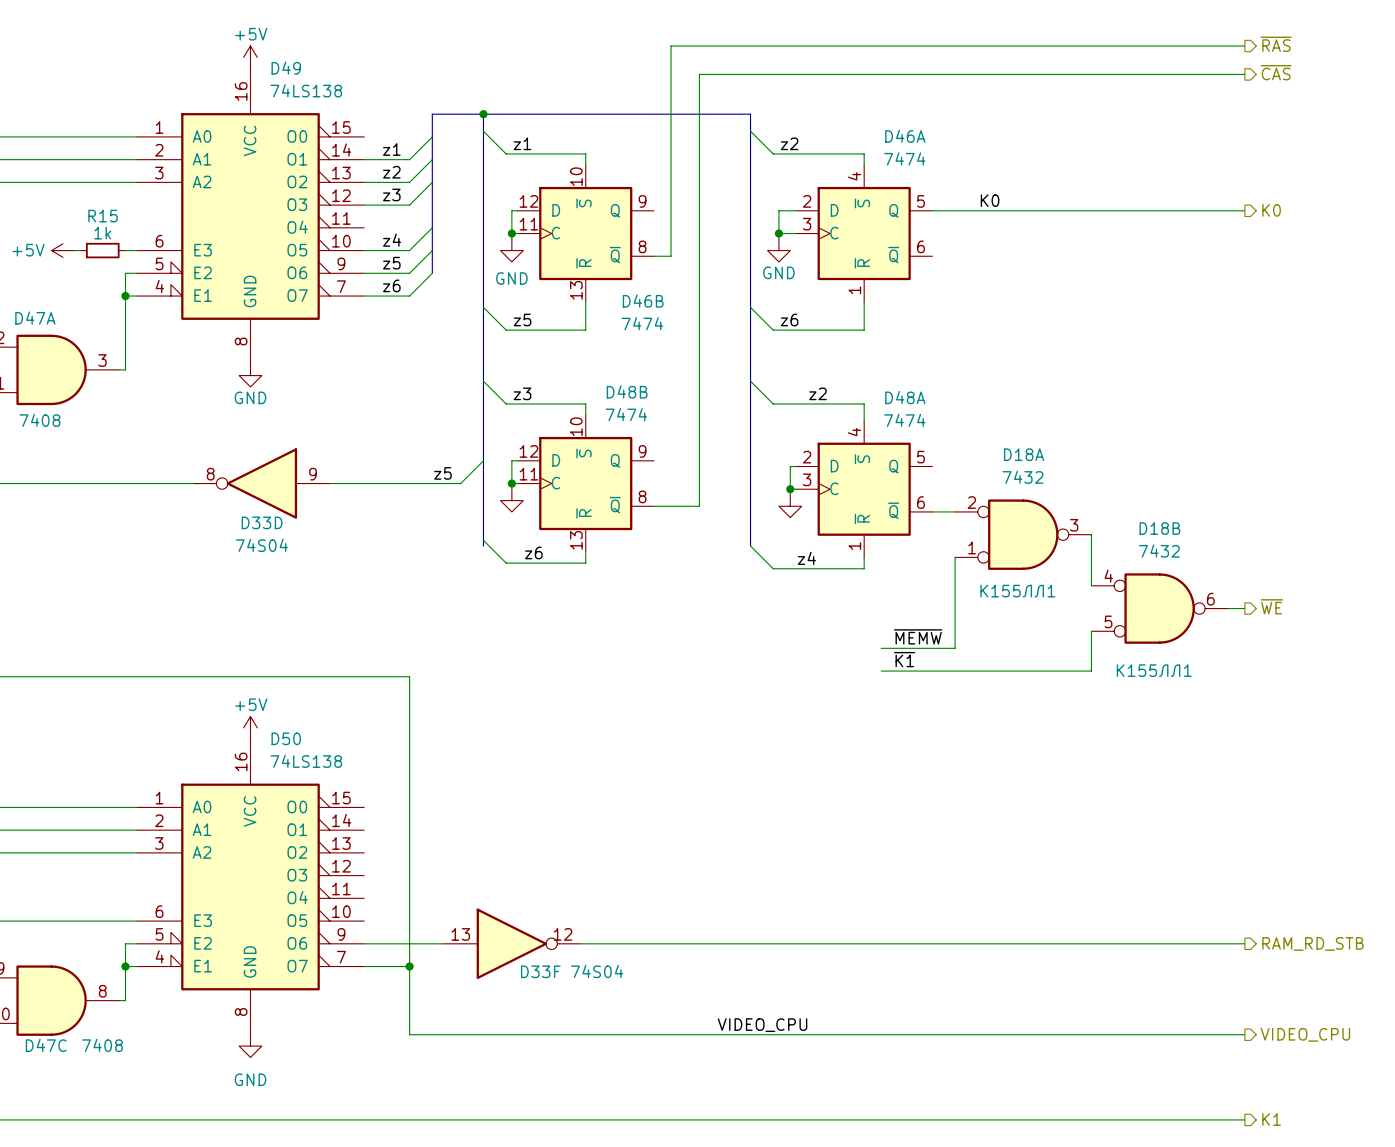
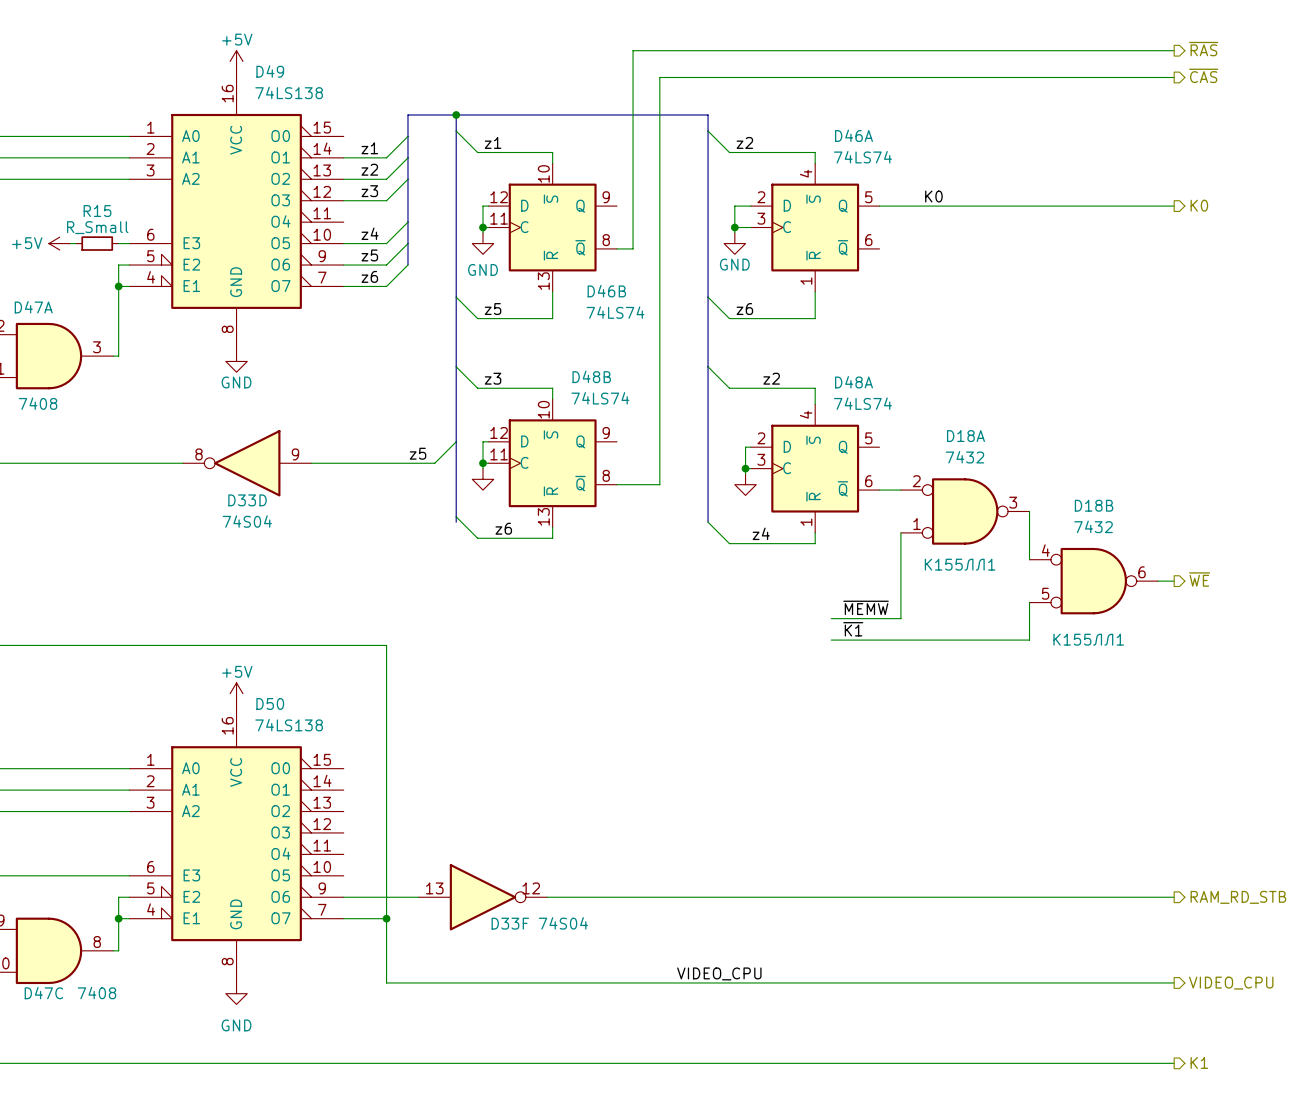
D46A value: 7474 (904, 158) -> 74LS74 (862, 157)
R15 value: 1k (102, 233) -> R_Small (97, 227)
D46B value: 7474 (642, 323) -> 74LS74 (615, 312)
D48B value: 7474 (626, 414) -> 74LS74 (600, 398)
D48A value: 7474 (904, 420) -> 74LS74 (862, 403)

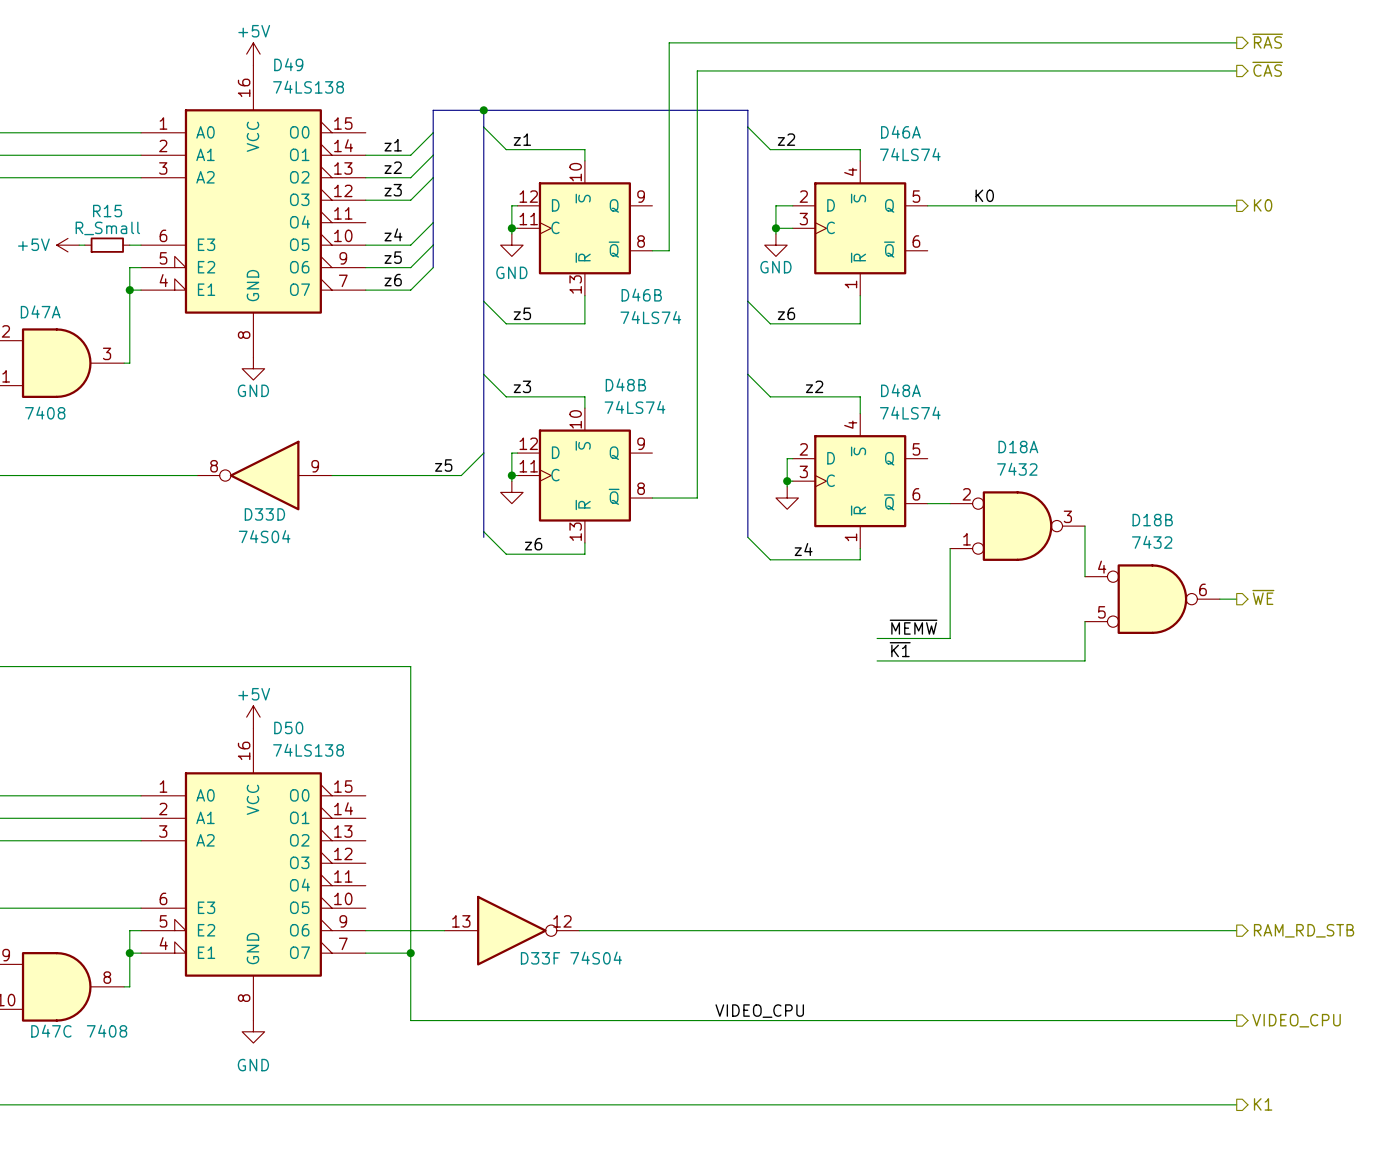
D18A text: К155ЛЛ1 (960, 564) -> none
D18B text: К155ЛЛ1 (1088, 639) -> none

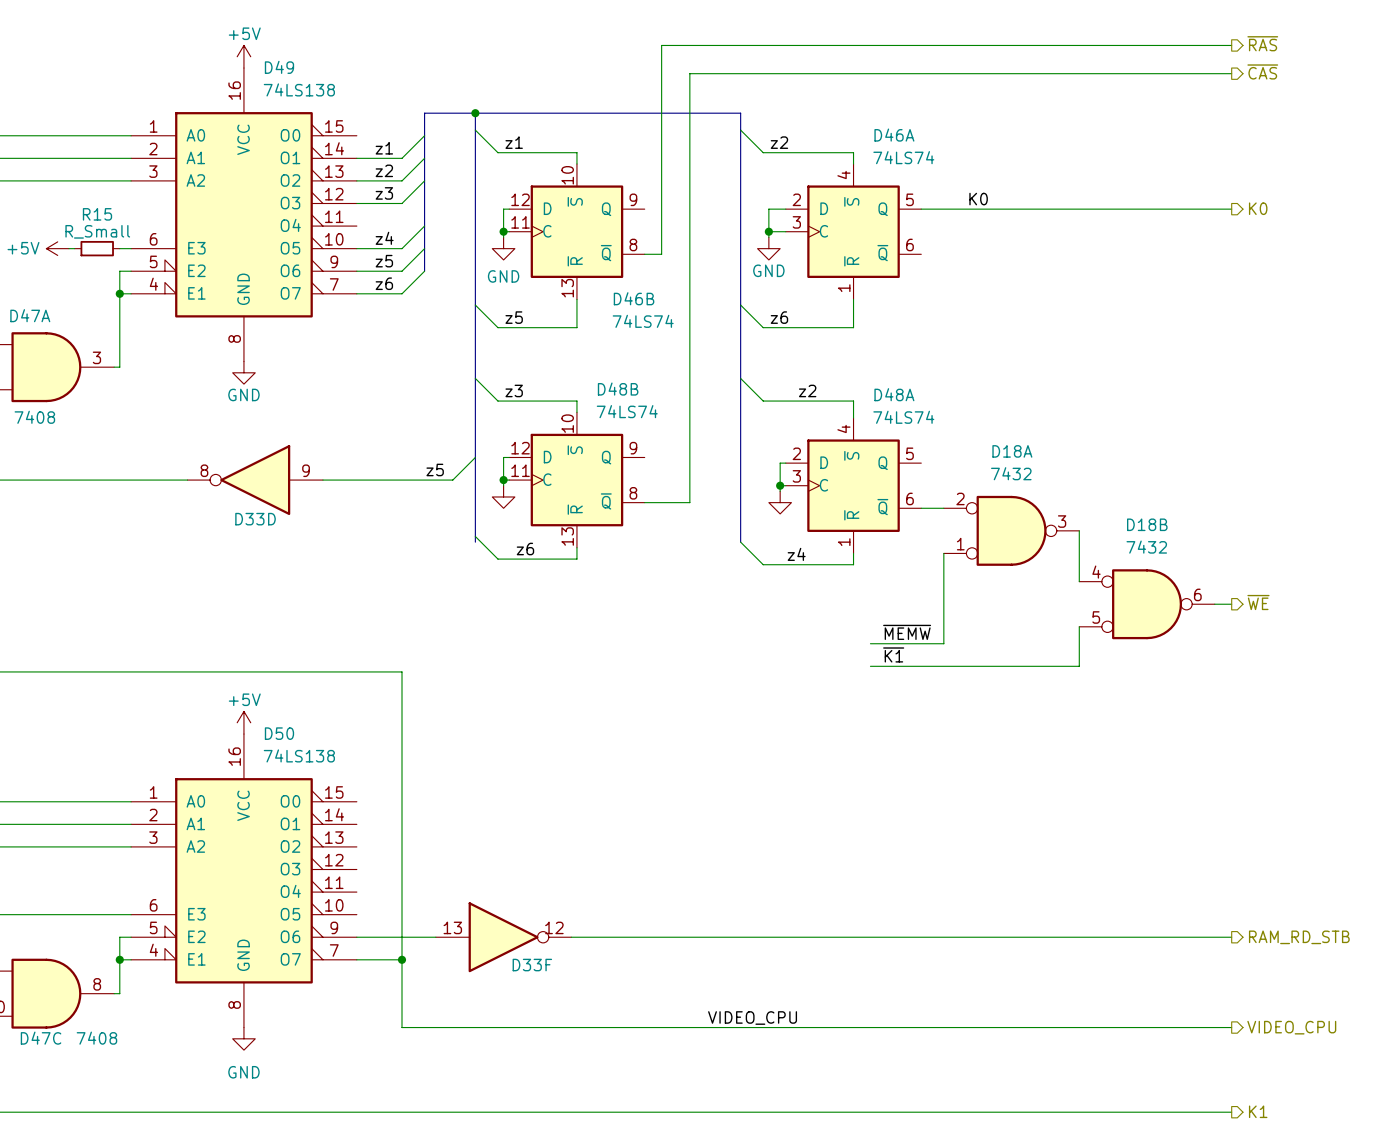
D33D value: 74S04 (264, 536) -> none
D33F value: 74S04 (596, 958) -> none

